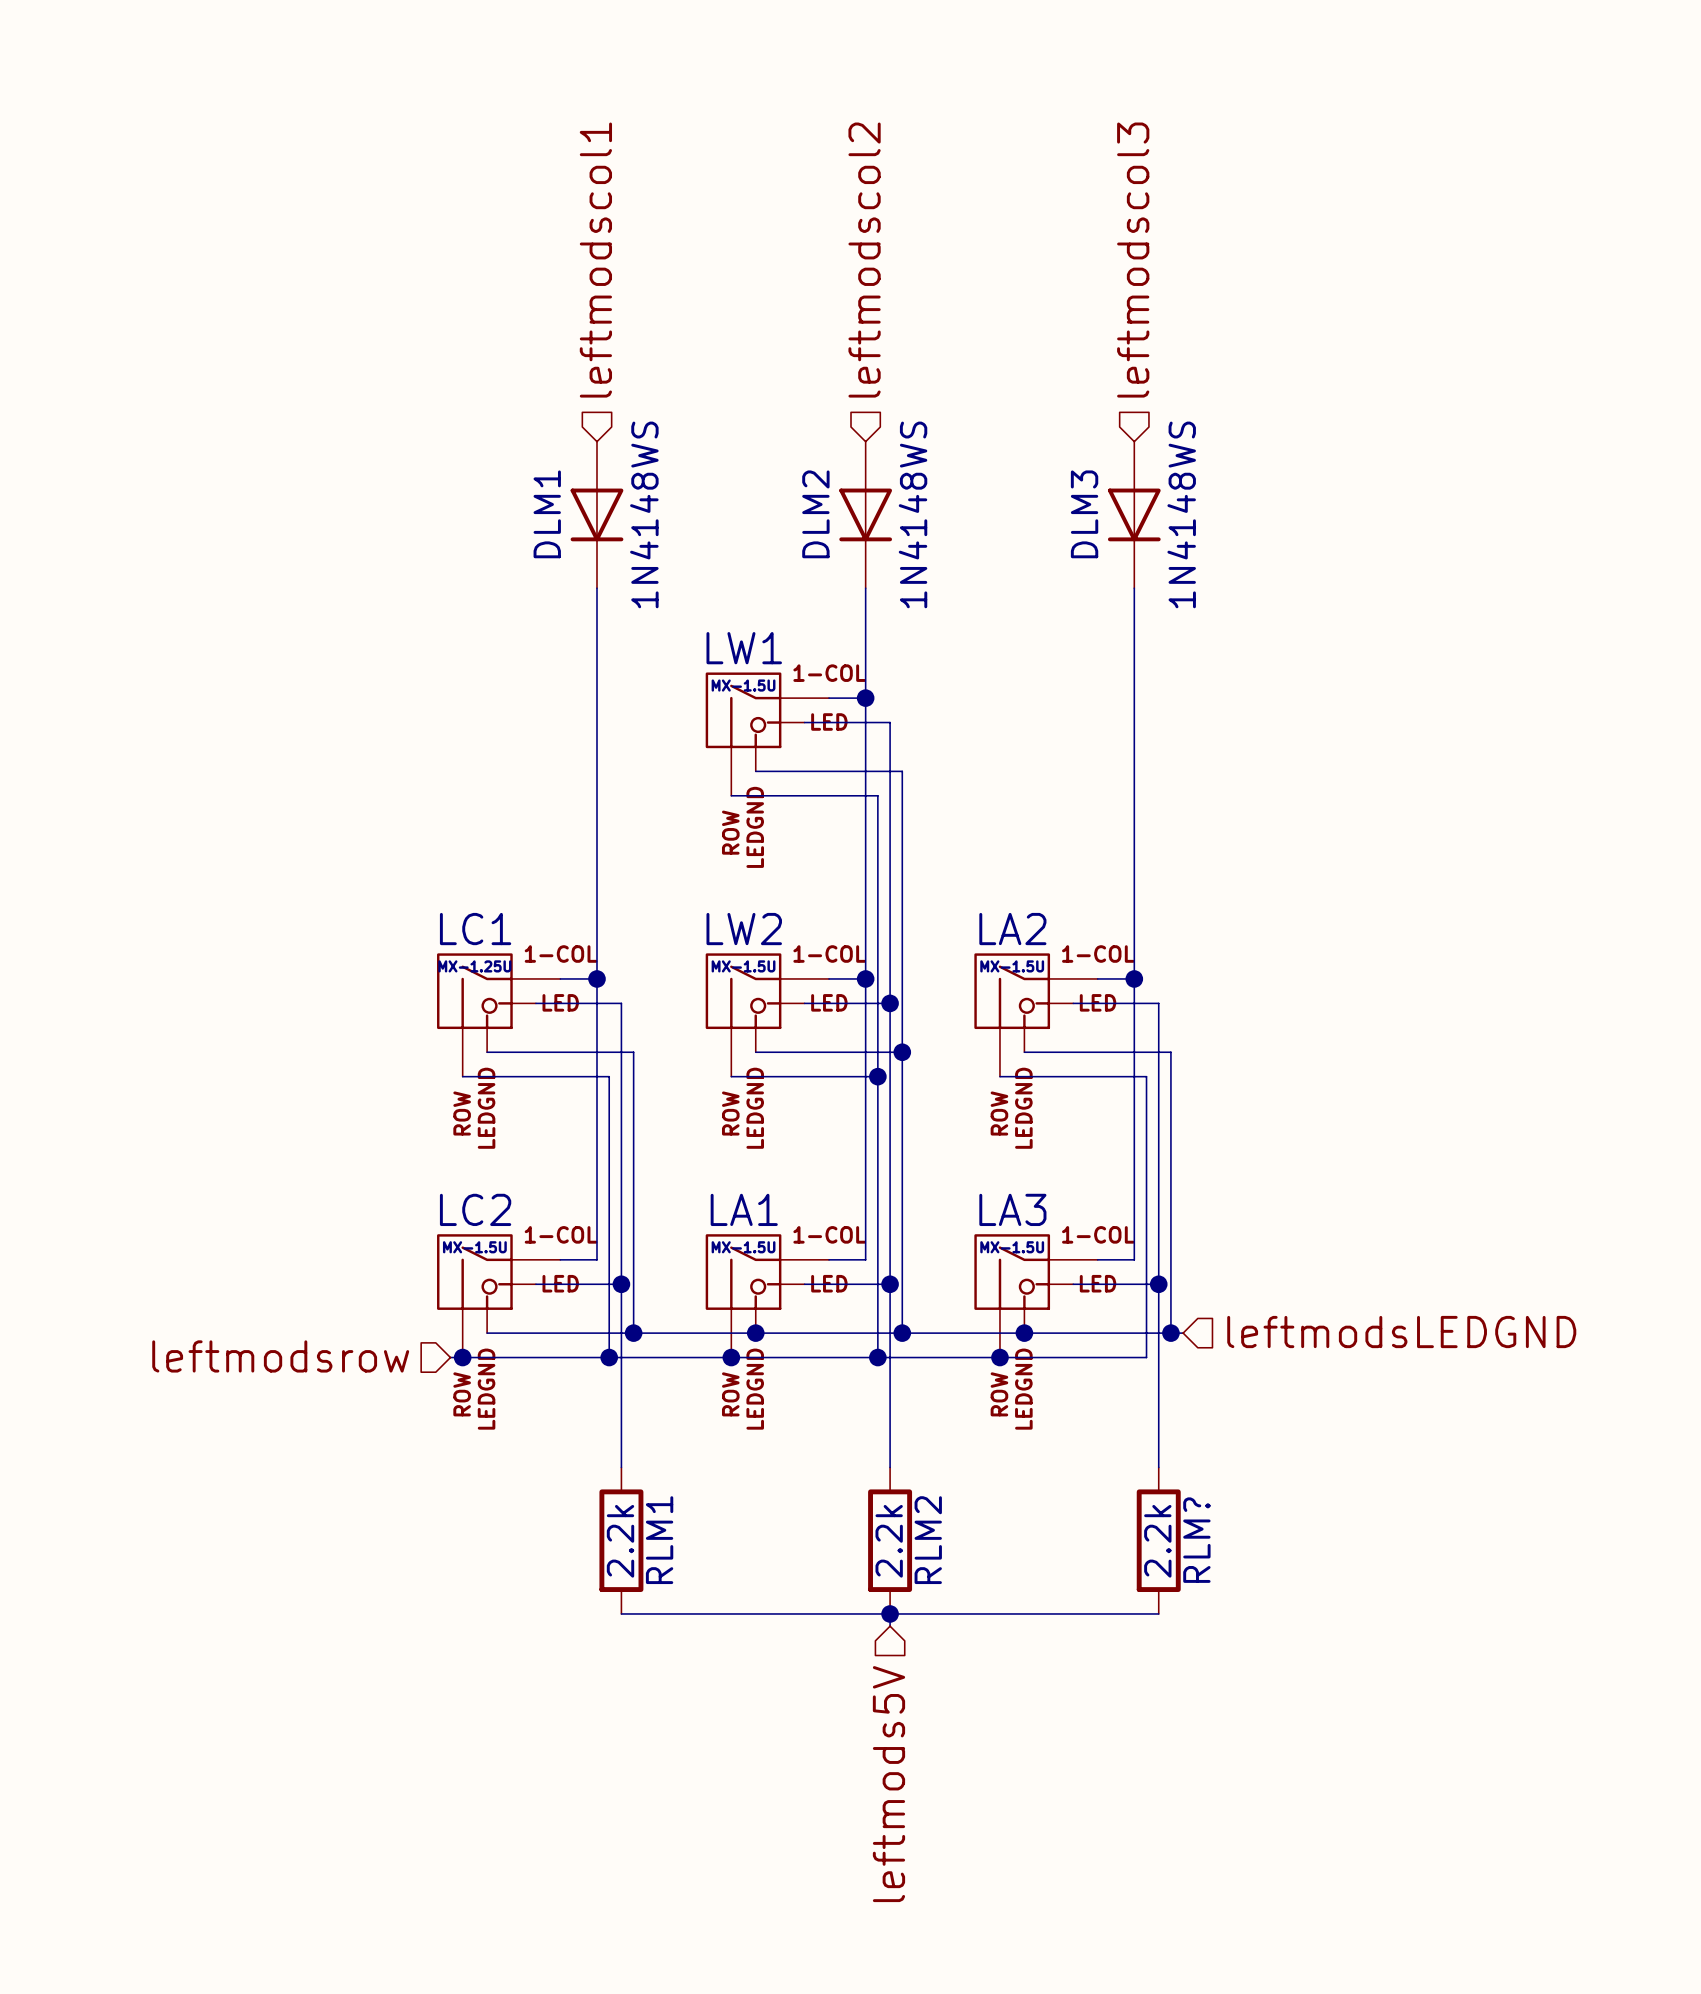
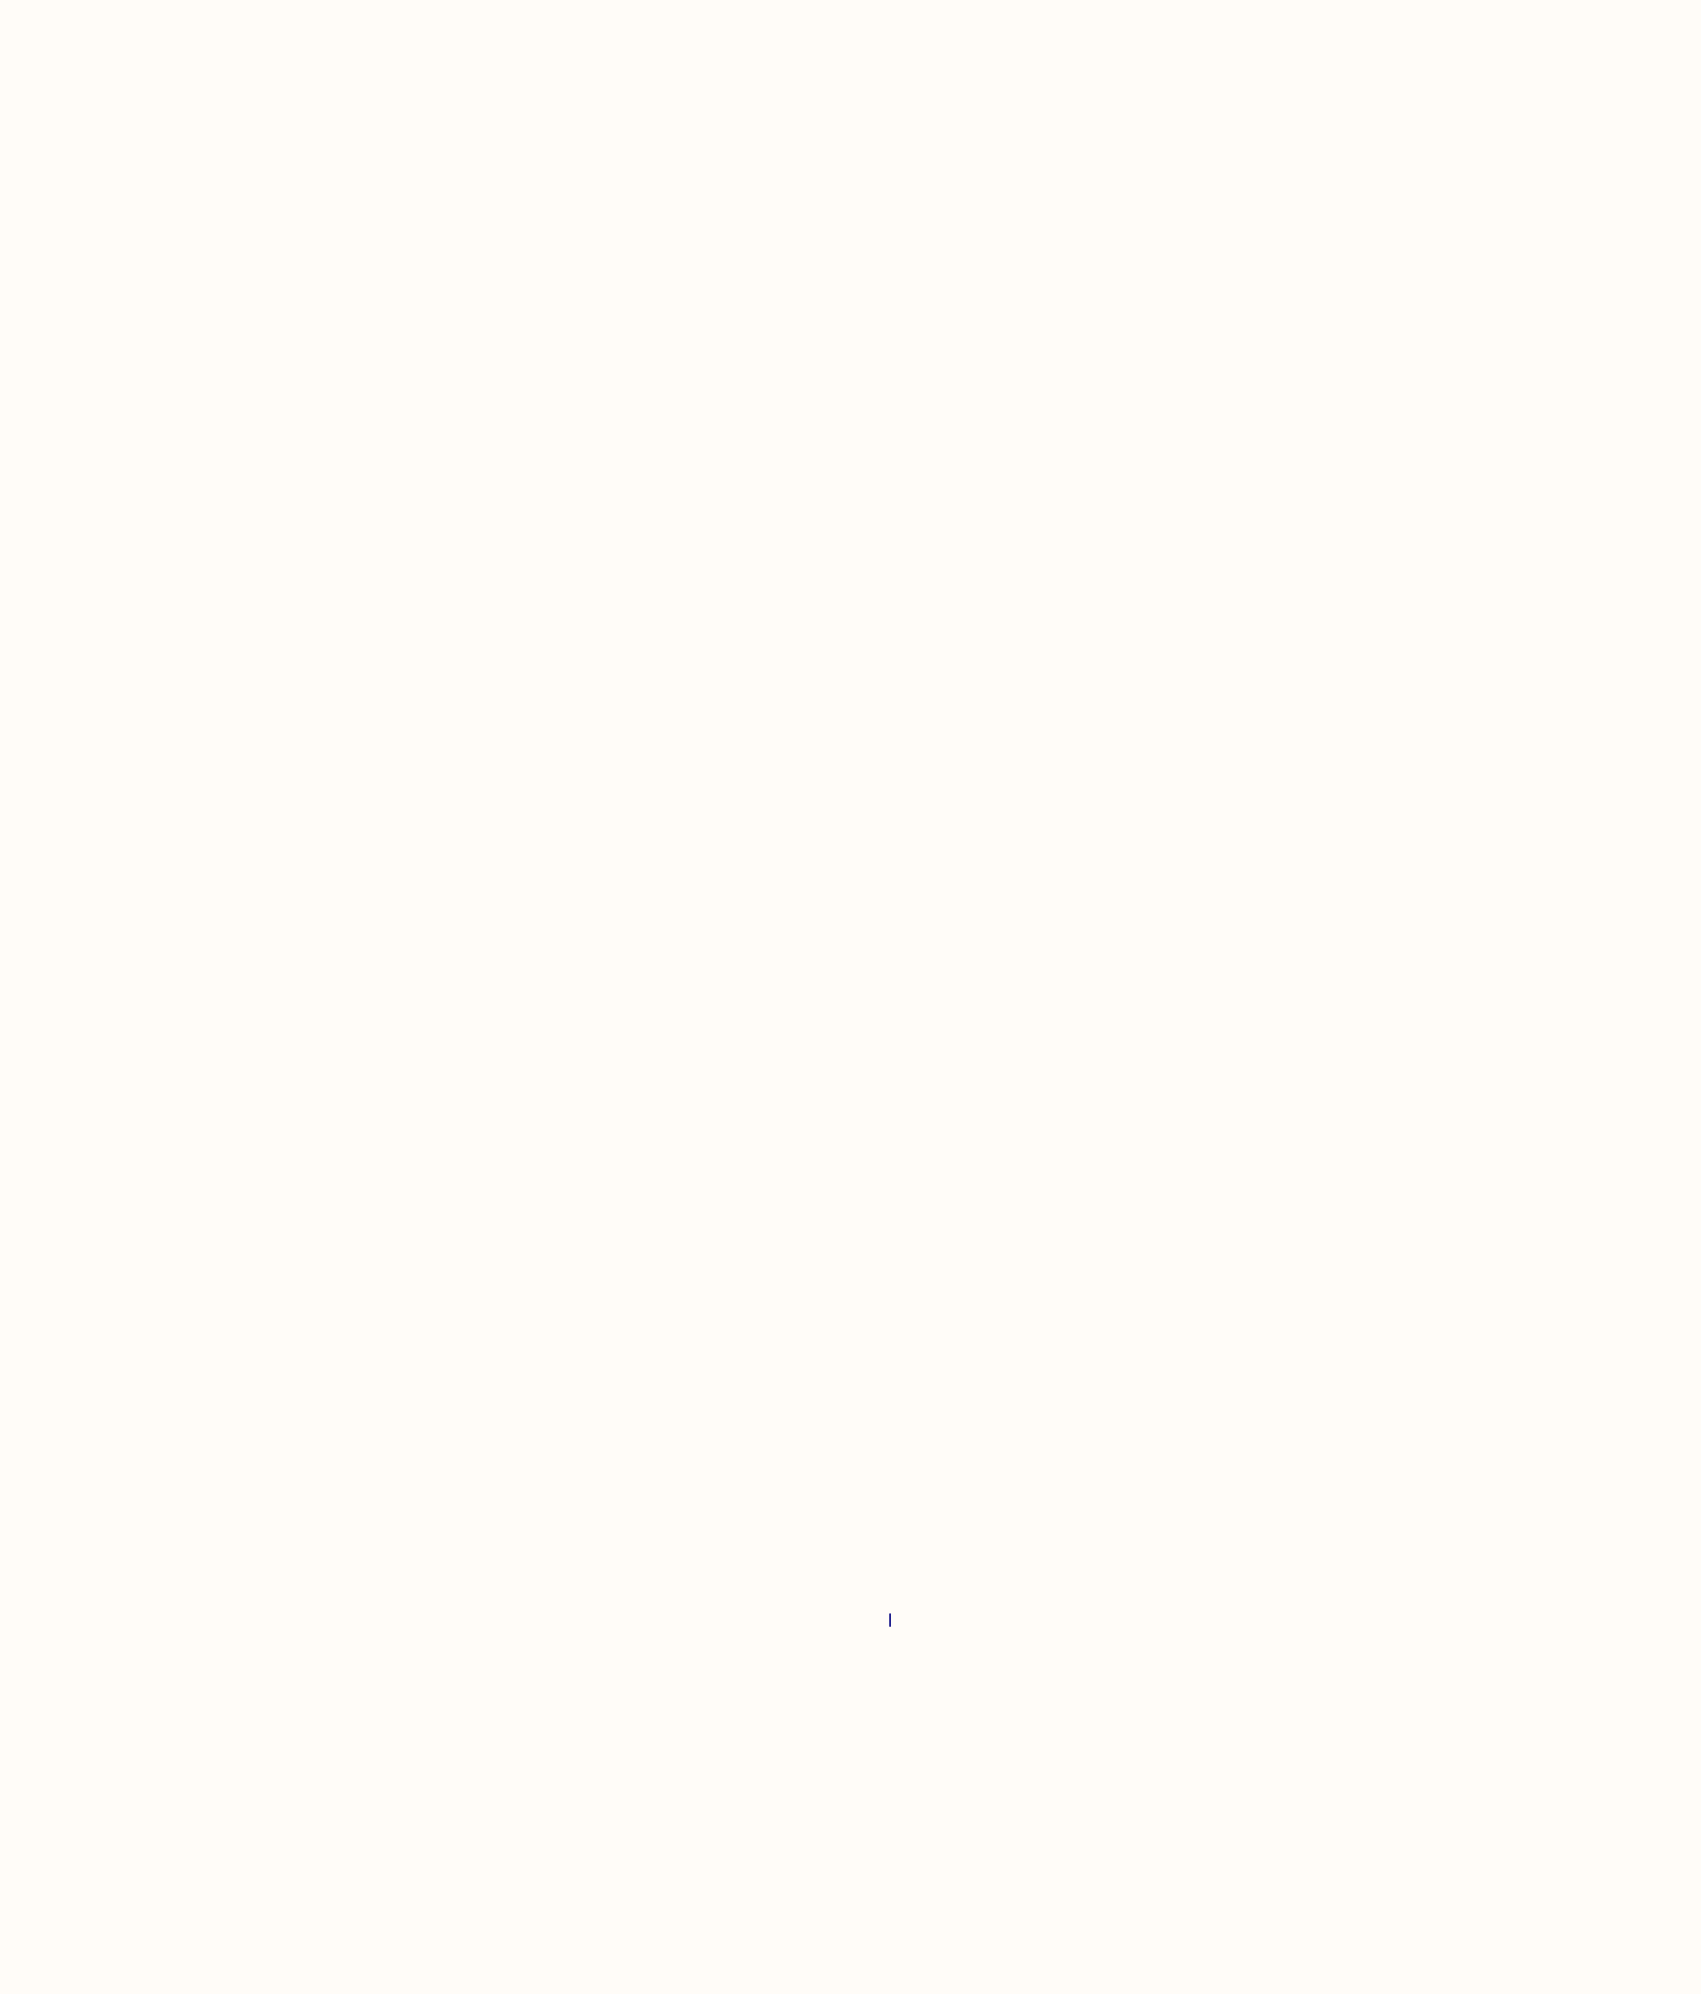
hierarchical label: leftmodscol1 (595, 260) -> none
hierarchical label: leftmodscol2 (864, 260) -> none
hierarchical label: leftmodscol3 (1133, 260) -> none
DLM1: 1N4148WS (596, 514) -> none
DLM2: 1N4148WS (865, 514) -> none
DLM3: 1N4148WS (1134, 514) -> none
wire: (596, 588) (596, 1259) (560, 1259) -> none
wire: (865, 588) (865, 1259) (829, 1259) -> none
wire: (1134, 588) (1134, 1259) (1097, 1259) -> none
wire: (829, 698) (865, 698) -> none
junction: (865, 698) -> none
wire: (804, 722) (890, 722) (890, 1467) -> none
LW1: MX-1.5U (767, 734) -> none
wire: (755, 771) (902, 771) (902, 1333) -> none
wire: (731, 795) (877, 795) (877, 1357) -> none
wire: (560, 978) (596, 978) -> none
junction: (596, 978) -> none
wire: (829, 978) (865, 978) -> none
junction: (865, 978) -> none
wire: (1097, 978) (1134, 978) -> none
junction: (1134, 978) -> none
wire: (535, 1003) (621, 1003) (621, 1467) -> none
wire: (804, 1003) (890, 1003) -> none
junction: (890, 1003) -> none
wire: (1073, 1003) (1158, 1003) (1158, 1467) -> none
LC1: MX-1.25U (498, 1015) -> none
LW2: MX-1.5U (767, 1015) -> none
LA2: MX-1.5U (1036, 1015) -> none
wire: (487, 1052) (633, 1052) (633, 1333) -> none
wire: (755, 1052) (902, 1052) -> none
junction: (902, 1052) -> none
wire: (1024, 1052) (1170, 1052) (1170, 1333) -> none
wire: (462, 1076) (609, 1076) (609, 1357) -> none
wire: (731, 1076) (877, 1076) -> none
junction: (877, 1076) -> none
wire: (999, 1076) (1146, 1076) (1146, 1357) (450, 1357) -> none
wire: (535, 1284) (621, 1284) -> none
junction: (621, 1284) -> none
wire: (804, 1284) (890, 1284) -> none
junction: (890, 1284) -> none
wire: (1073, 1284) (1158, 1284) -> none
junction: (1158, 1284) -> none
LC2: MX-1.5U (498, 1295) -> none
LA1: MX-1.5U (767, 1295) -> none
LA3: MX-1.5U (1036, 1295) -> none
hierarchical label: leftmodsLEDGND (1401, 1332) -> none
wire: (487, 1333) (1183, 1333) -> none
junction: (633, 1333) -> none
junction: (755, 1333) -> none
junction: (902, 1333) -> none
junction: (1024, 1333) -> none
junction: (1170, 1333) -> none
hierarchical label: leftmodsrow (280, 1356) -> none
junction: (462, 1357) -> none
junction: (609, 1357) -> none
junction: (731, 1357) -> none
junction: (877, 1357) -> none
junction: (999, 1357) -> none
RLM1: 2.2k (621, 1540) -> none
RLM2: 2.2k (890, 1540) -> none
RLM?: 2.2k (1158, 1540) -> none
wire: (621, 1613) (1158, 1613) -> none
junction: (890, 1613) -> none
hierarchical label: leftmods5V (888, 1784) -> none

